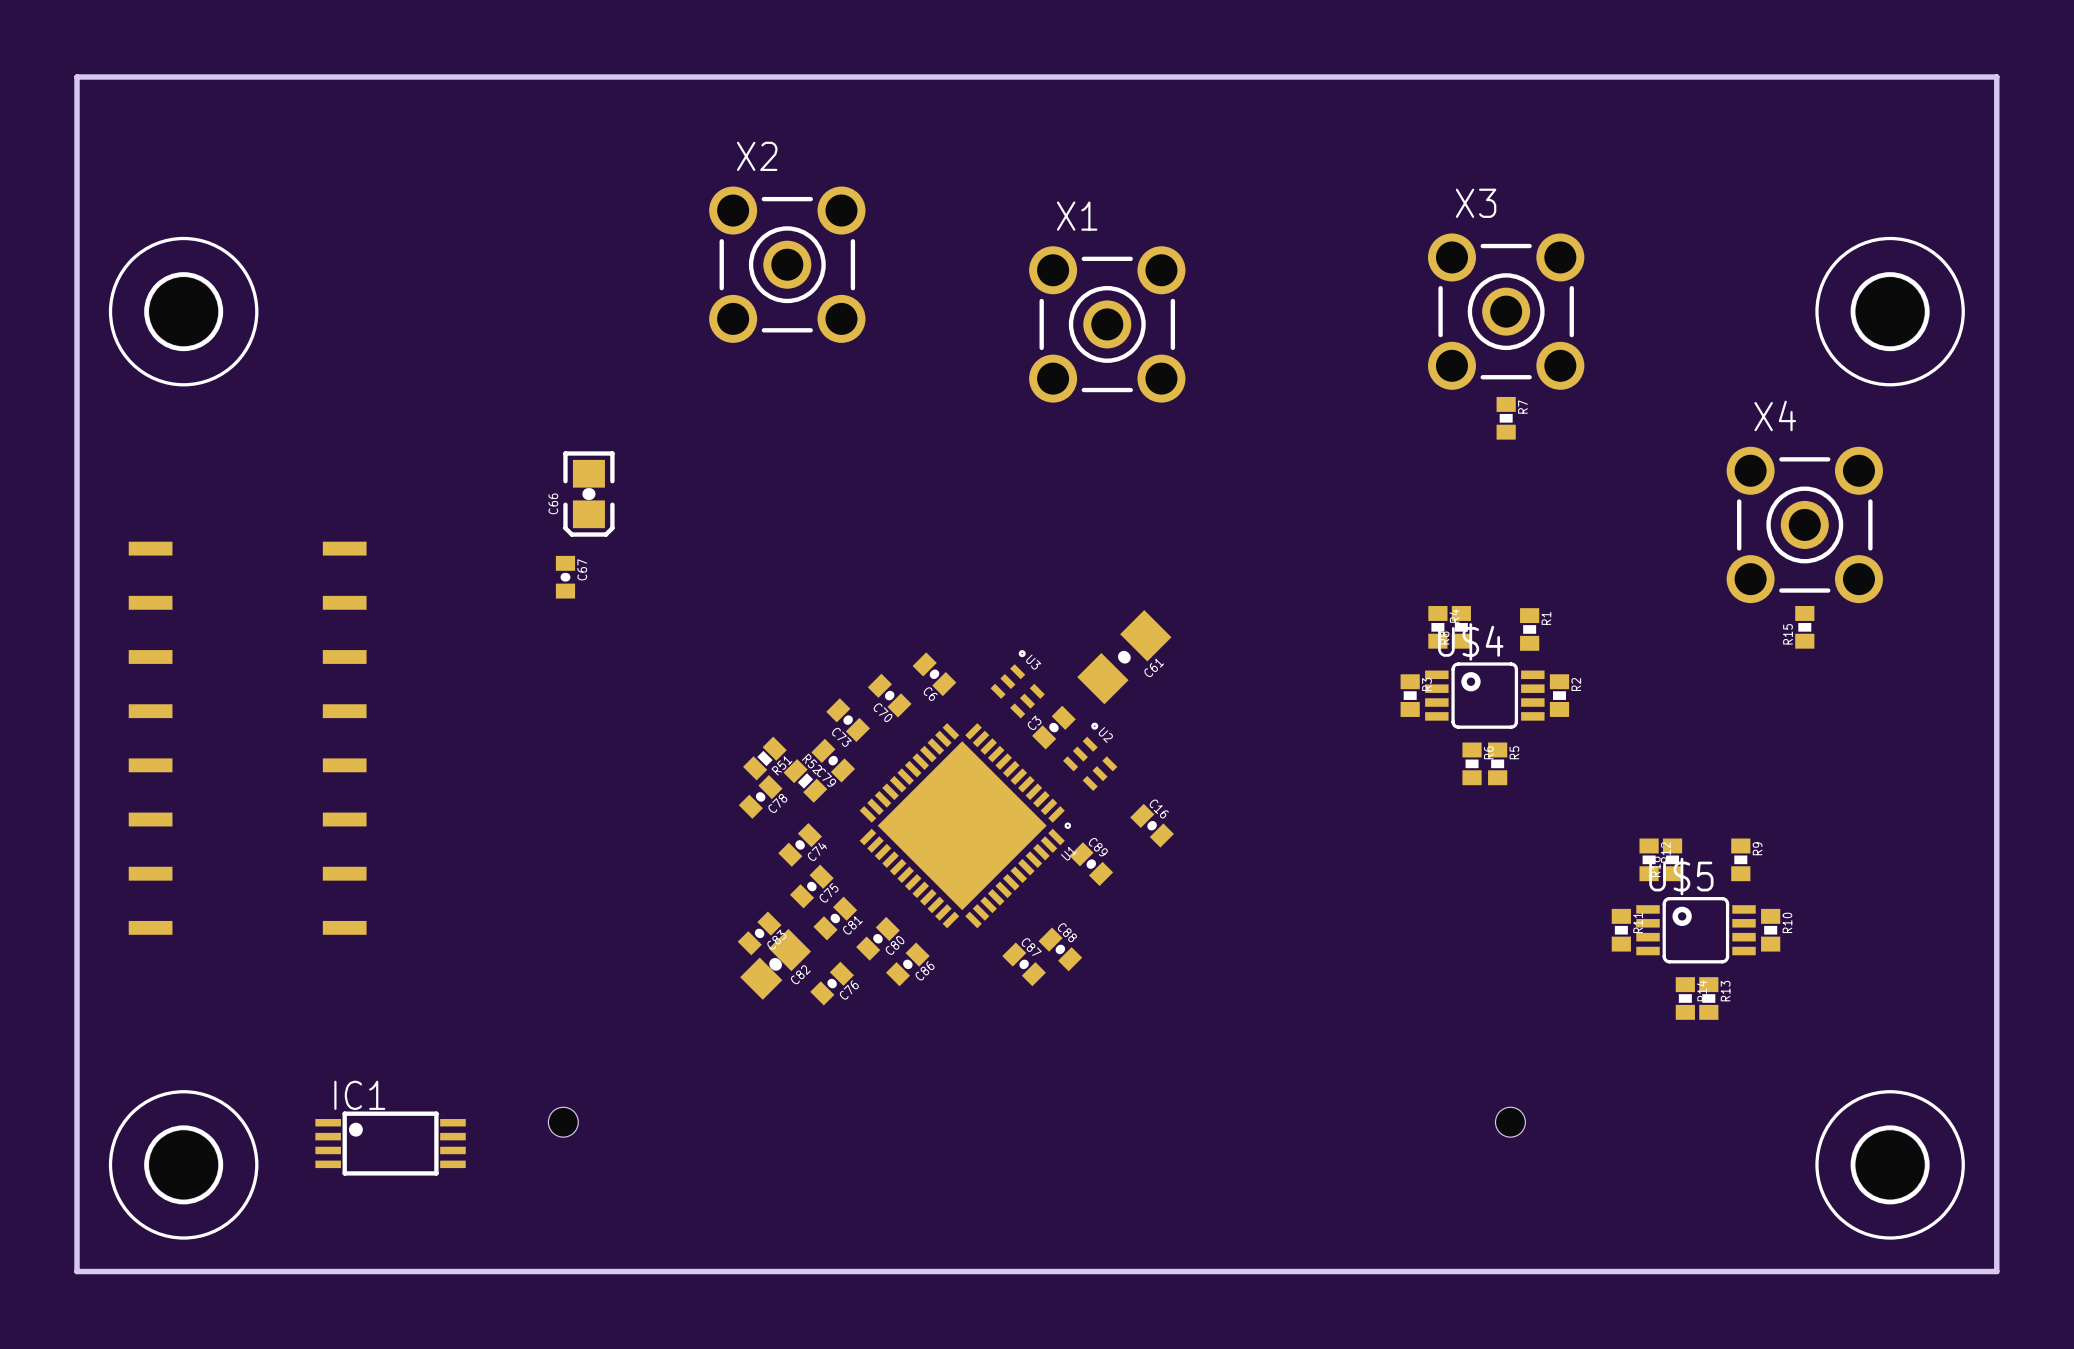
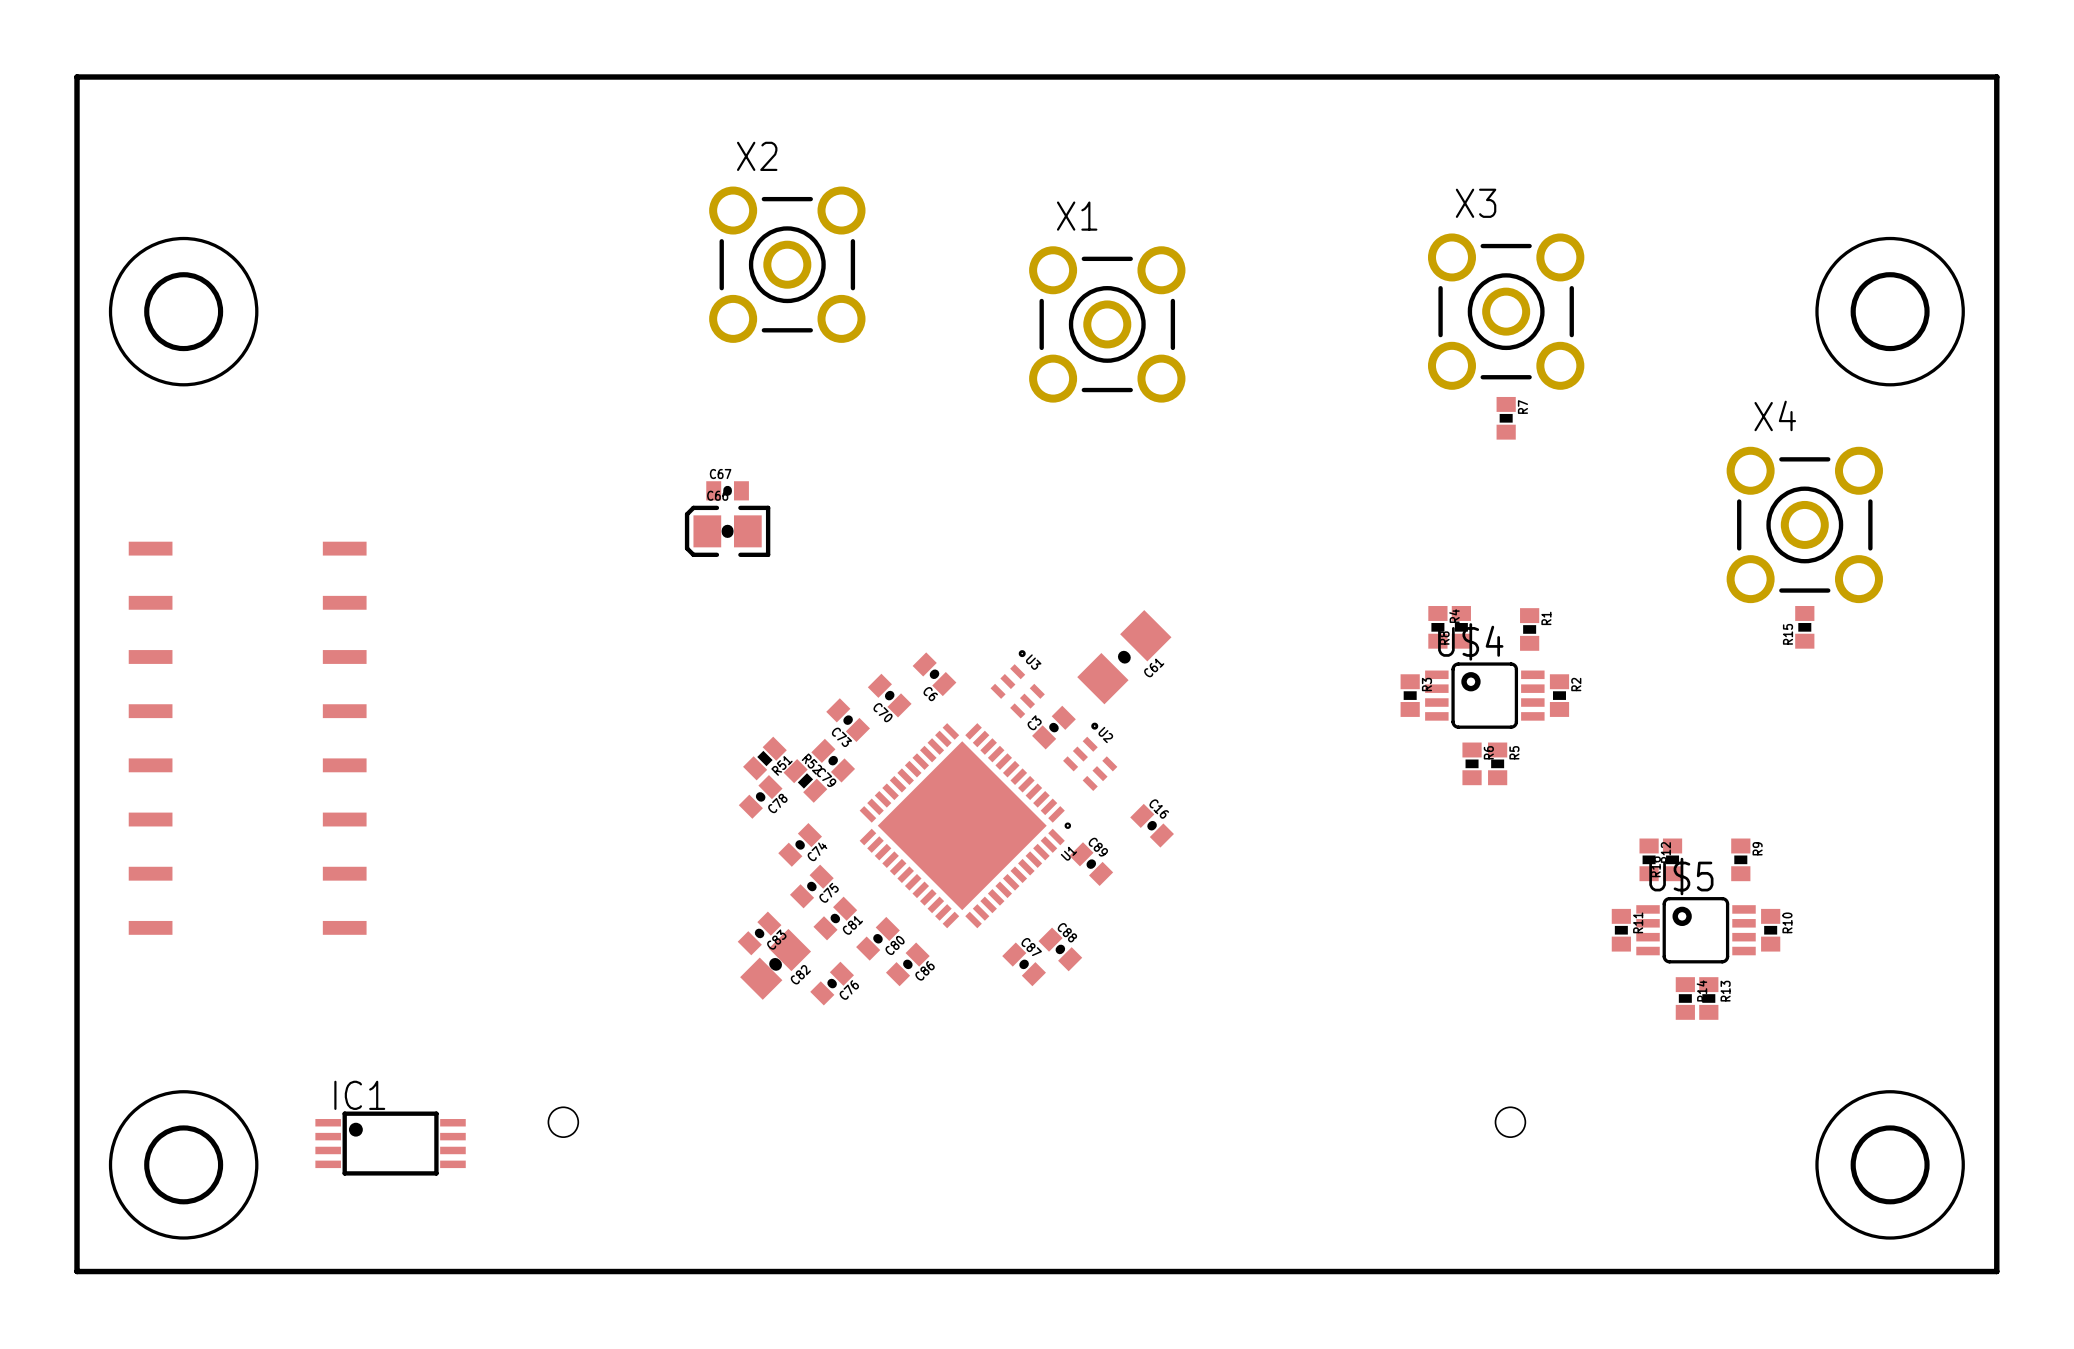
C66 rotation: 0° (588, 494) -> 90° clockwise (727, 531)
C66 position: (588, 494) -> (727, 531)
C67 rotation: 0° (565, 577) -> 90° clockwise (727, 490)
C67 position: (565, 577) -> (727, 490)

